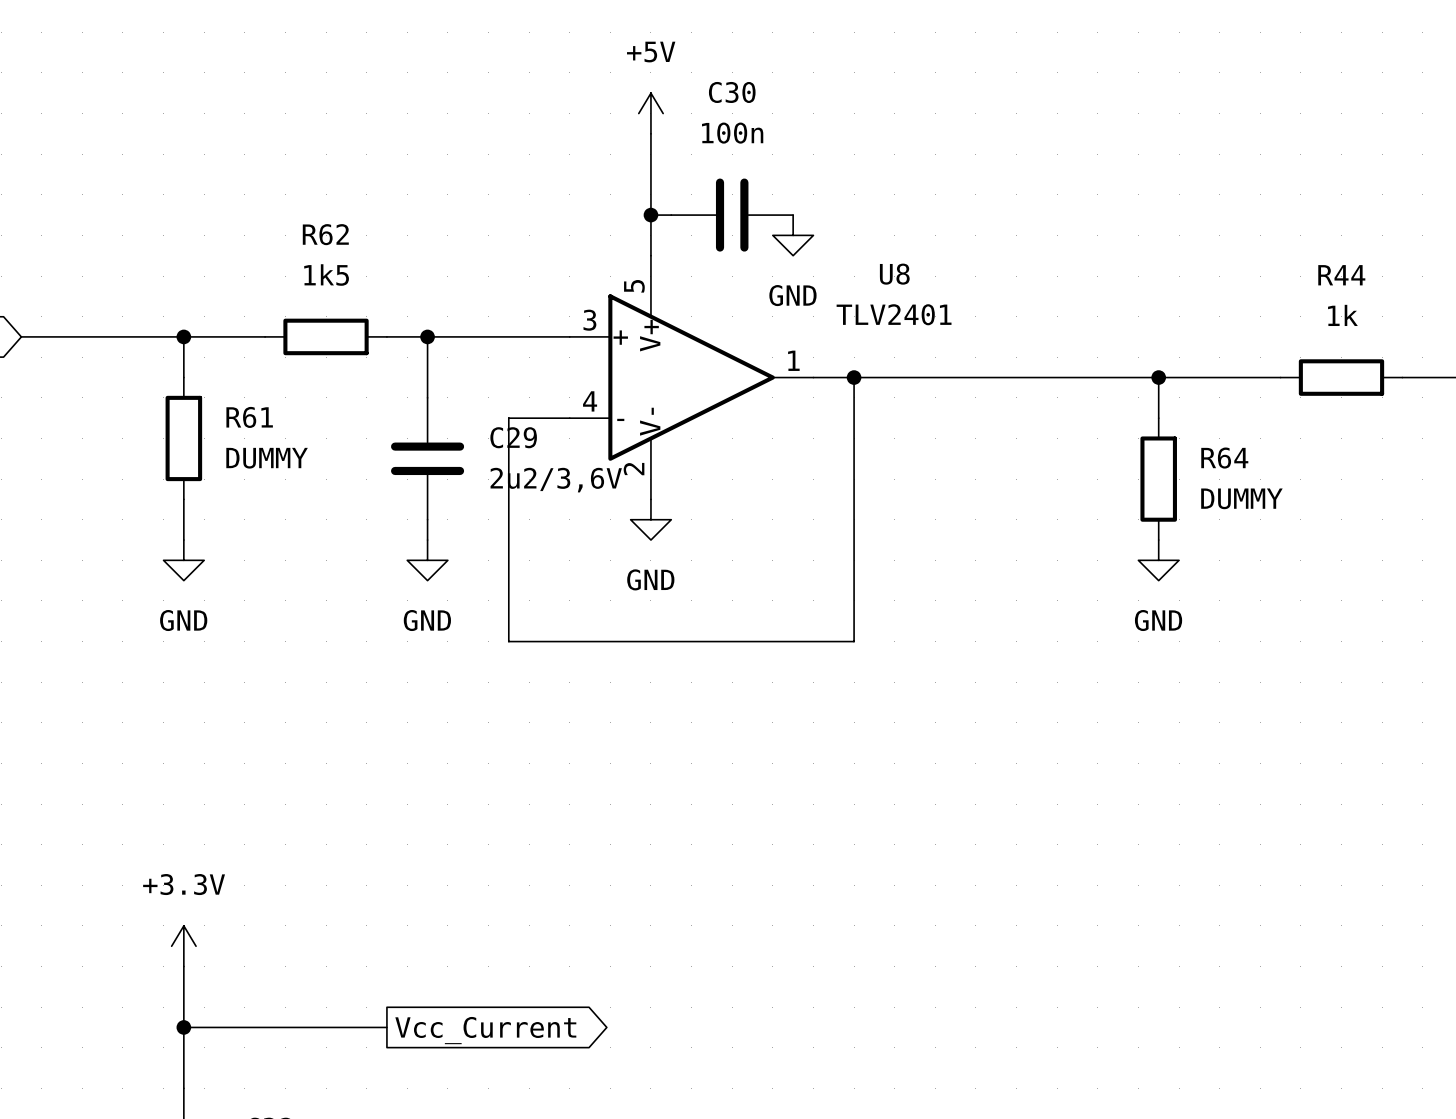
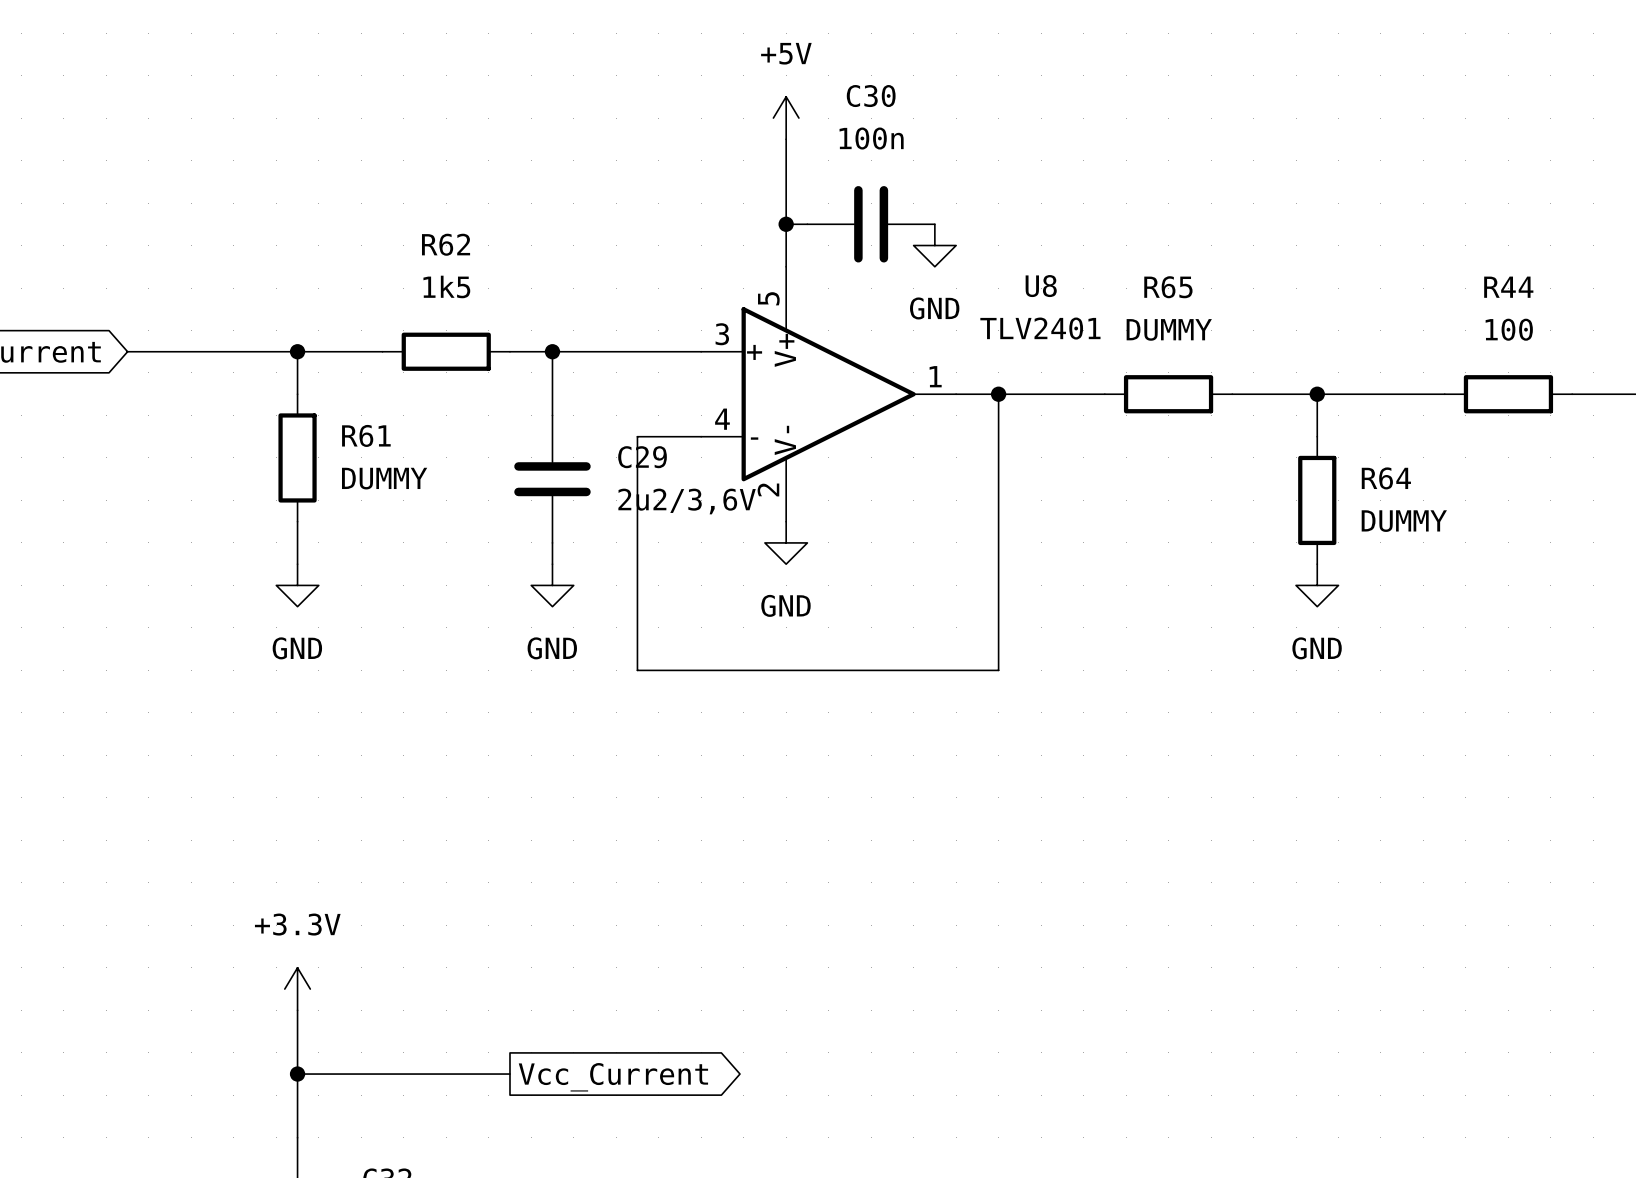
R44 value: 1k (1342, 315) -> 100 (1509, 329)
wire: (955, 377) (1077, 377) -> none
R65: none -> DUMMY (1168, 394)

